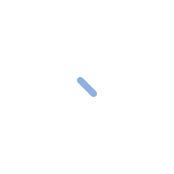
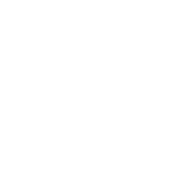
track: (80, 80) (93, 93) -> none

